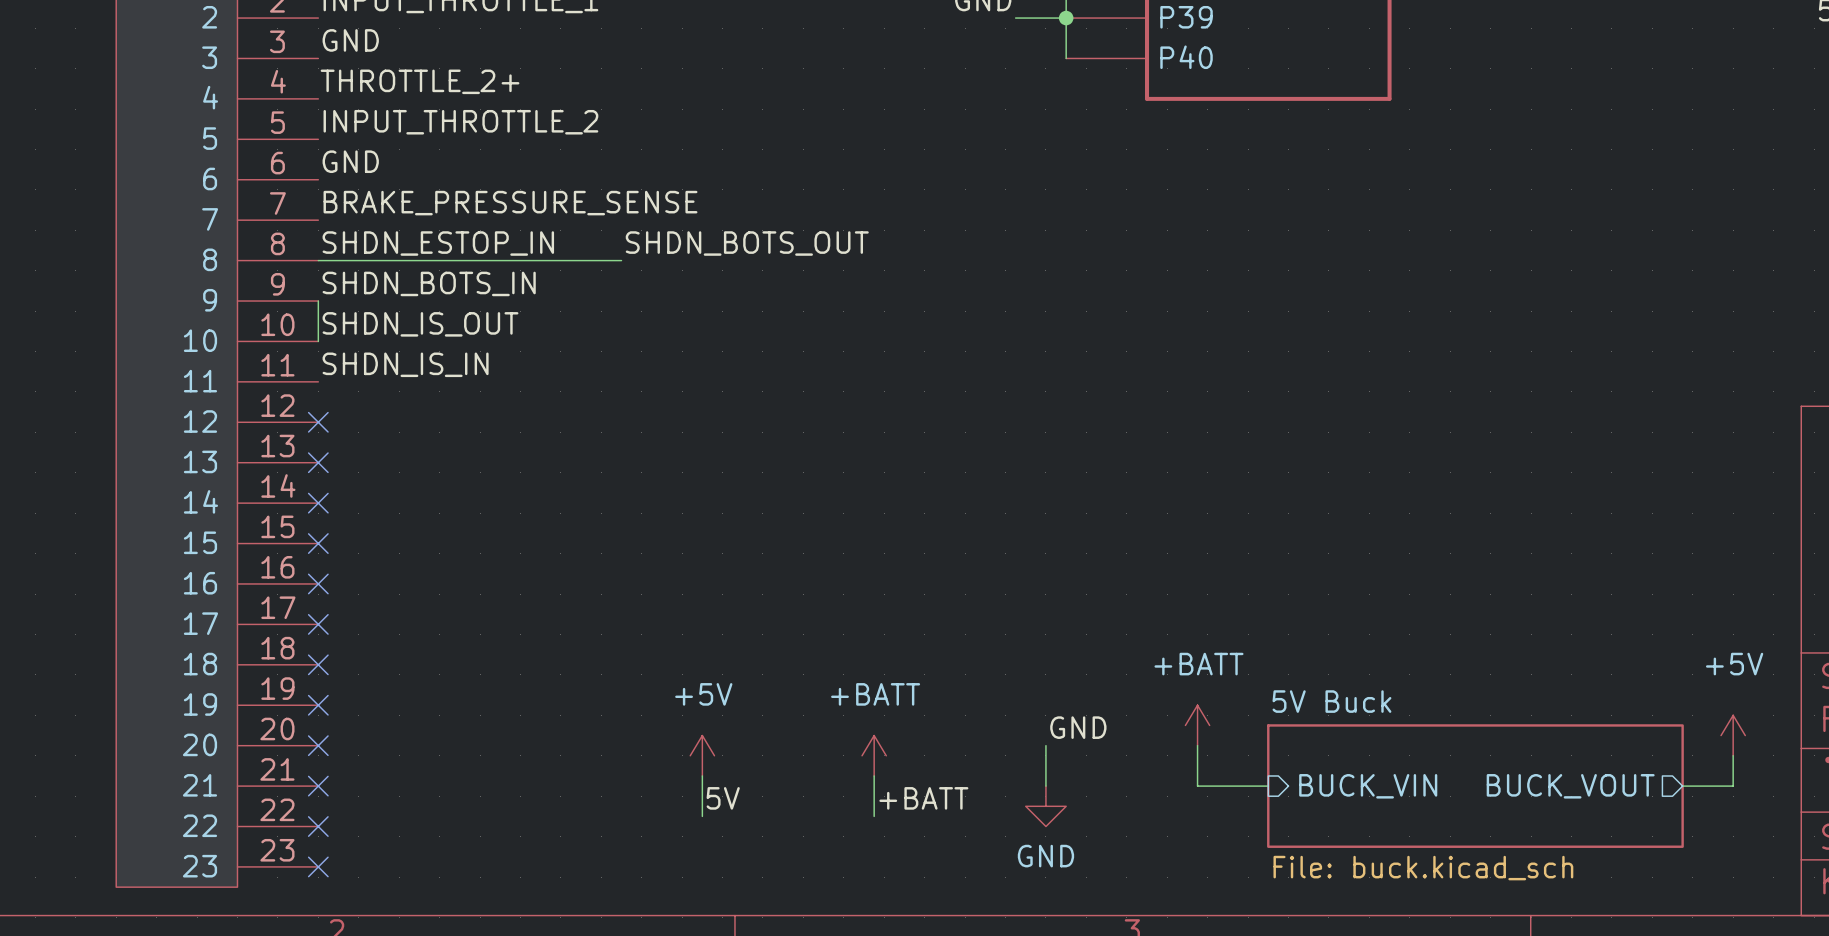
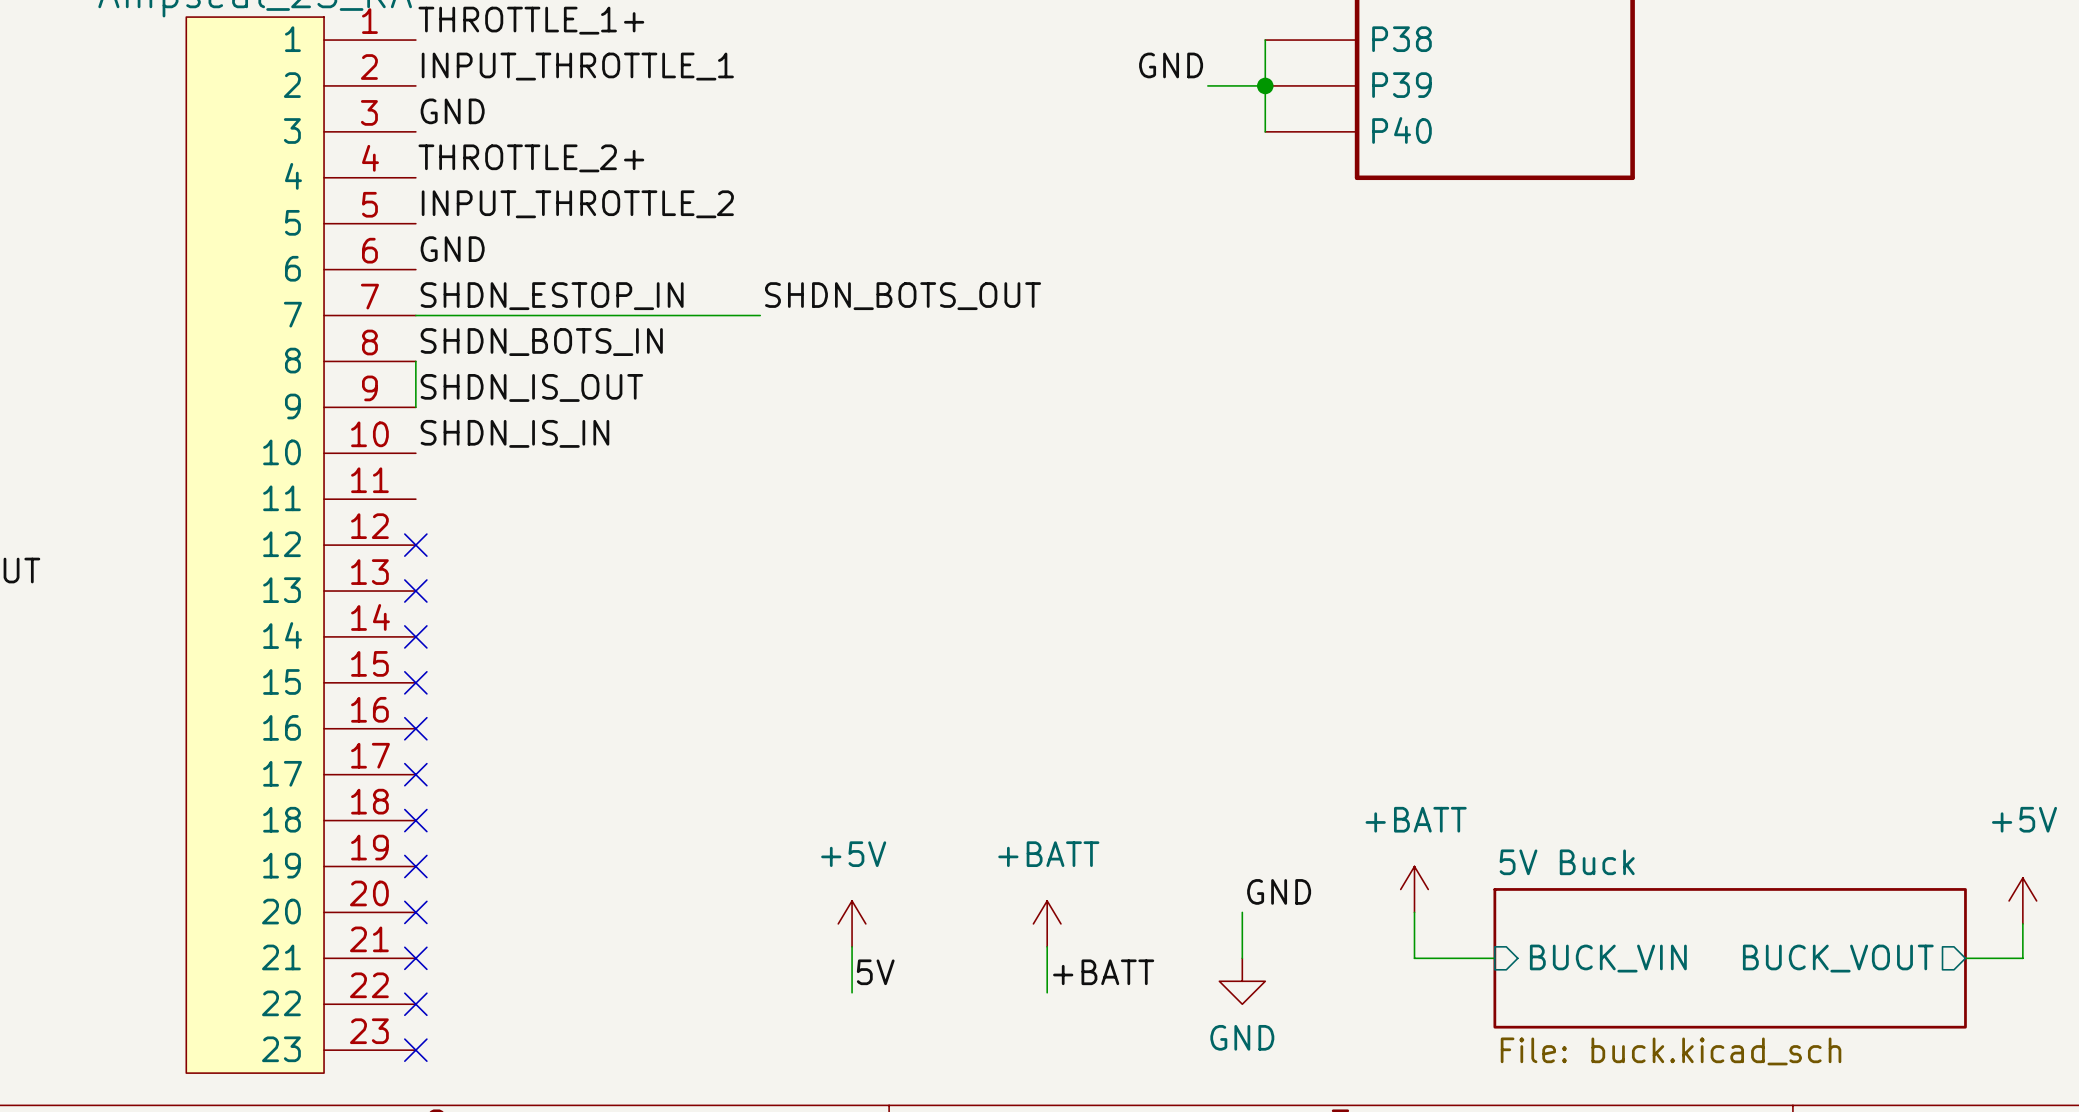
label: BRAKE_PRESSURE_SENSE (510, 203) -> SHDN_ESTOP_IN (552, 296)
label: SHDN_ESTOP_IN (438, 243) -> SHDN_BOTS_IN (541, 342)
label position: SHDN_BOTS_OUT (747, 243) -> SHDN_BOTS_OUT (903, 296)
wire: (318, 260) (621, 260) -> (415, 315) (760, 315)
label: SHDN_BOTS_IN (429, 283) -> SHDN_IS_OUT (531, 387)
wire: (318, 301) (318, 341) -> (415, 407) (415, 361)
label: SHDN_IS_OUT (420, 324) -> SHDN_IS_IN (514, 433)
label: SHDN_IS_IN (405, 364) -> none

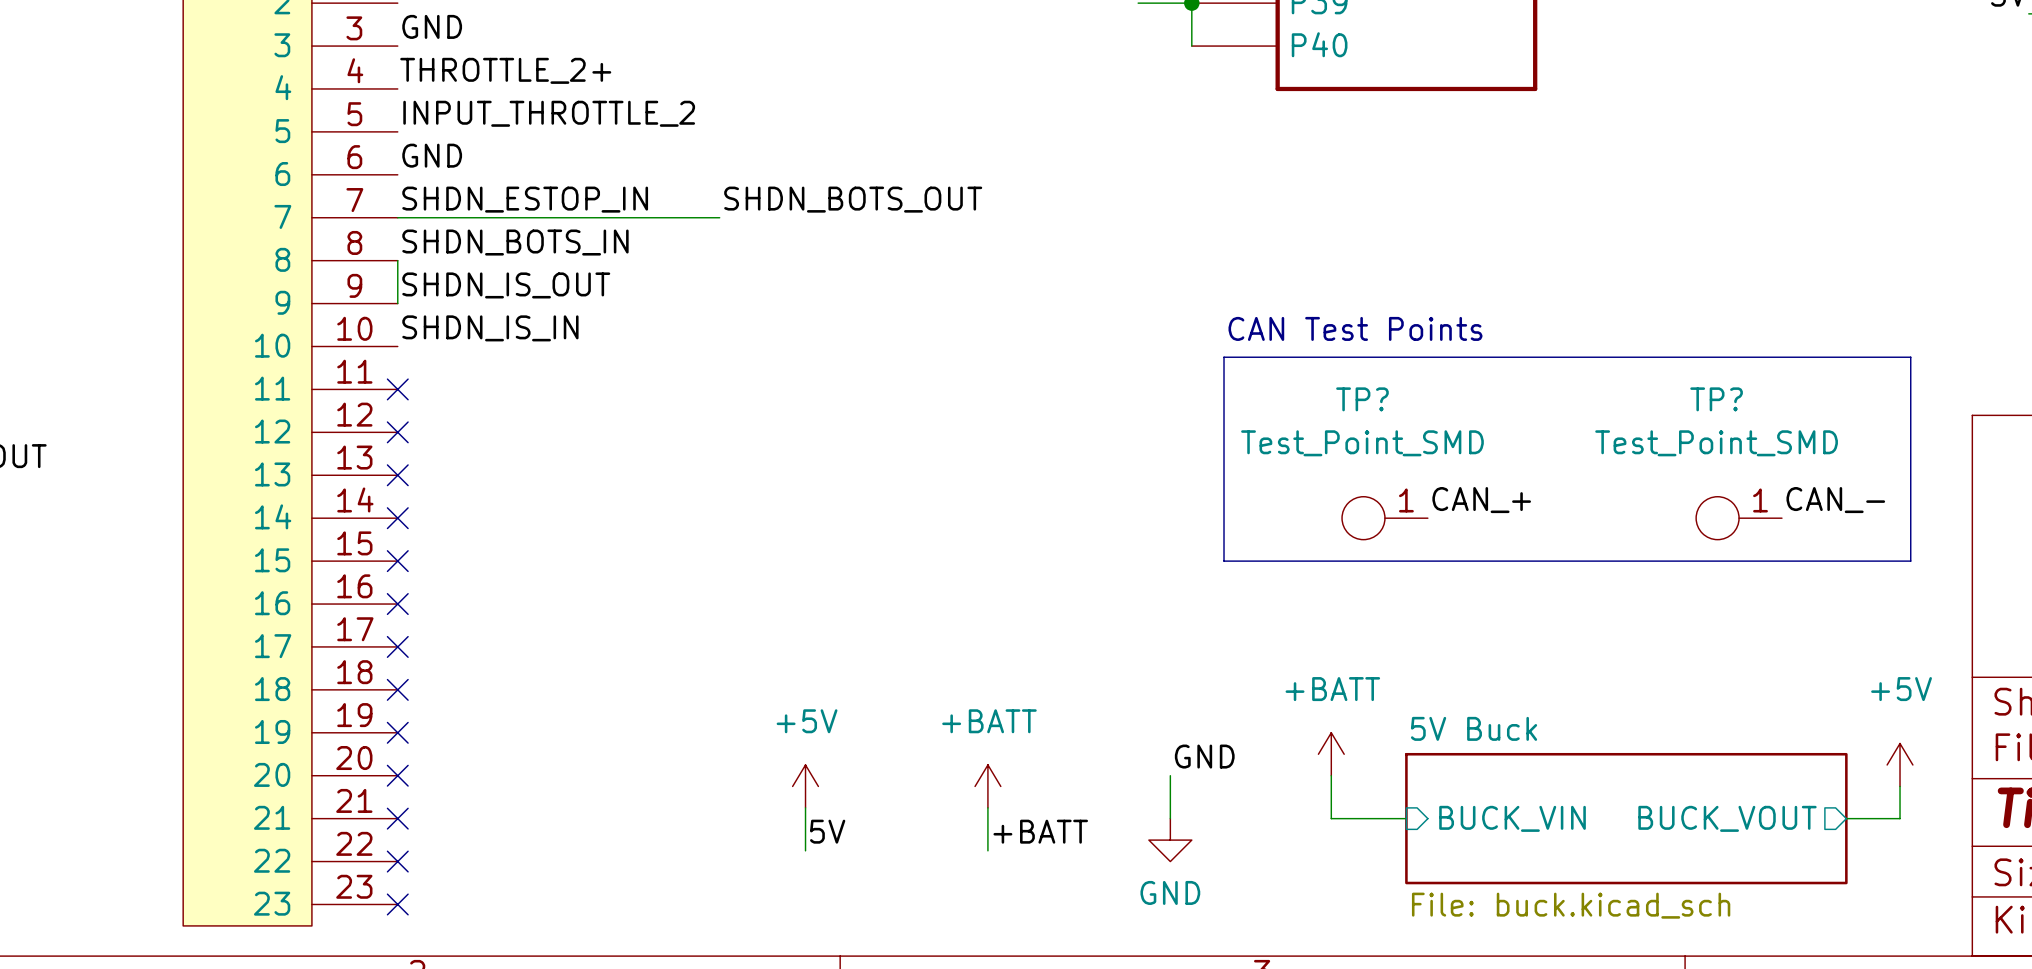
text: none -> CAN Test Points (1355, 328)
line: none -> (1224, 357) (1224, 561) (1910, 561) (1910, 357) (1224, 357)
no-connect mark: none -> (397, 389)
label: none -> CAN_+ (1481, 500)
label: none -> CAN_- (1835, 500)
TP?: none -> Test_Point_SMD (1384, 518)
TP?: none -> Test_Point_SMD (1739, 518)

